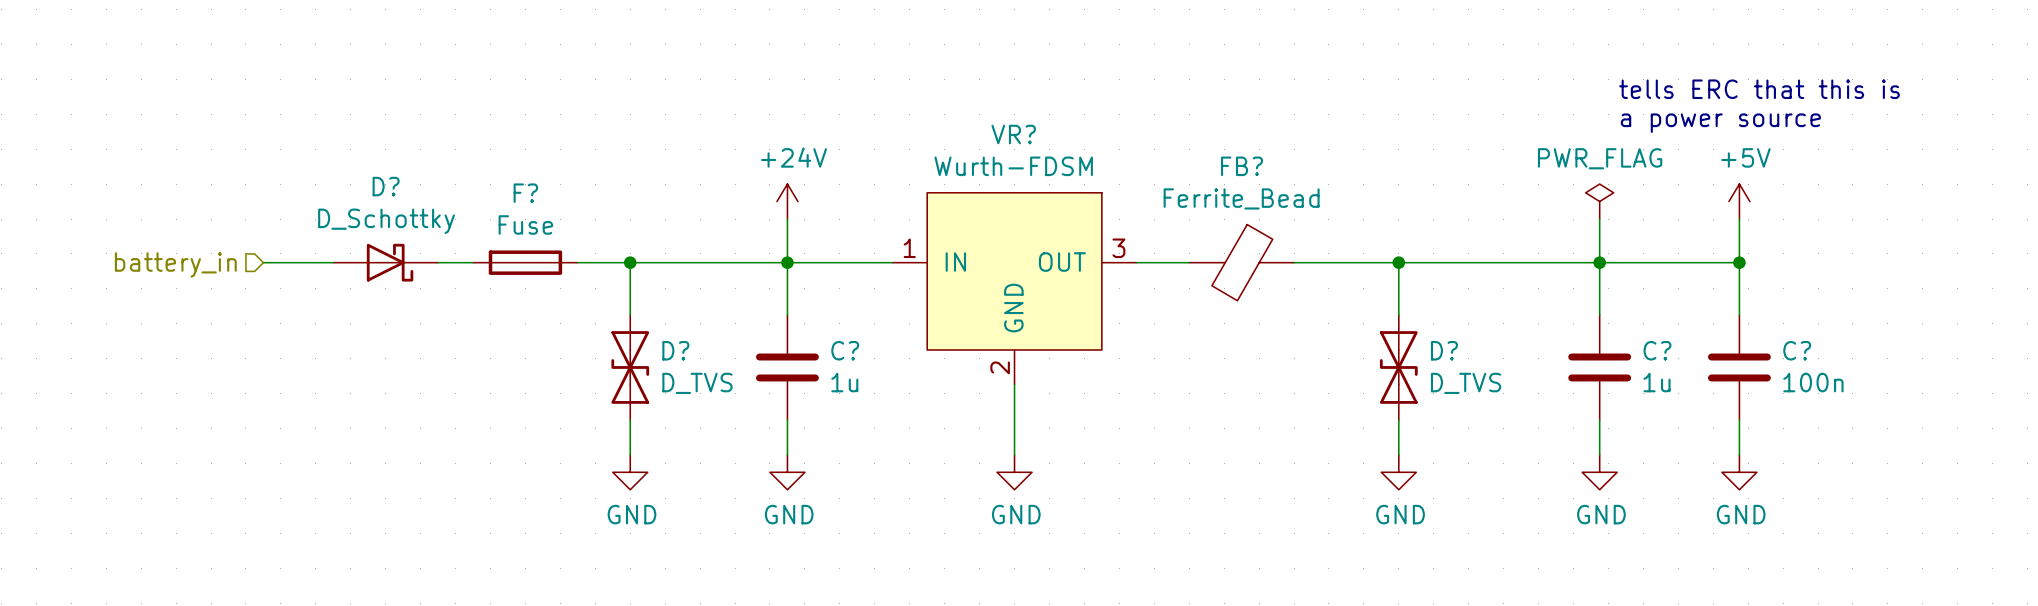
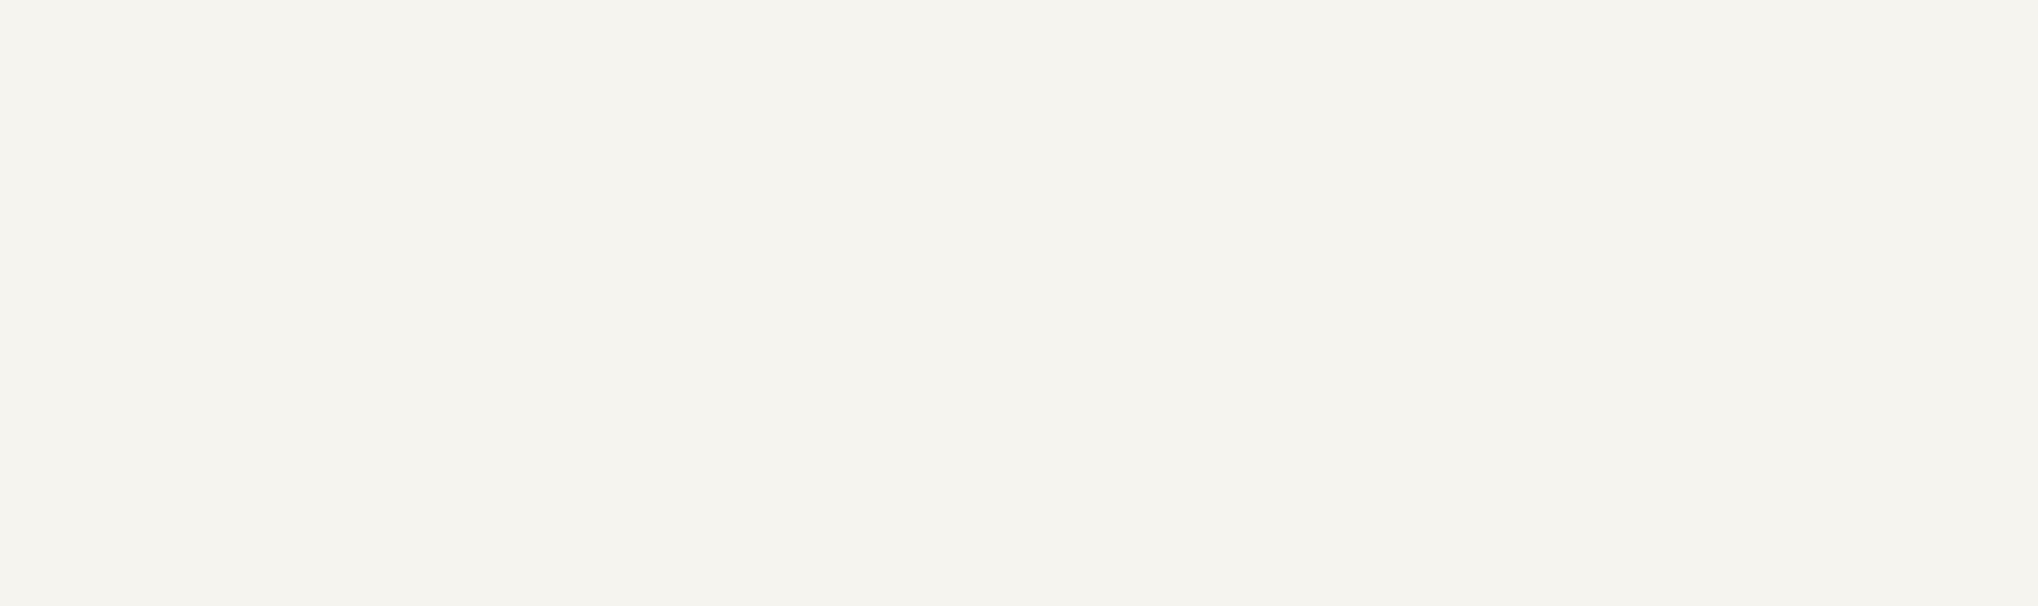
text: tells ERC that this is (1759, 89) -> none
text: a power source (1720, 123) -> none
power symbol: +24V (787, 201) -> none
power symbol: PWR_FLAG (1599, 201) -> none
power symbol: +5V (1739, 201) -> none
wire: (787, 219) (787, 315) -> none
wire: (1599, 219) (1599, 315) -> none
wire: (1739, 219) (1739, 315) -> none
wire: (263, 262) (333, 262) -> none
D?: D_Schottky (385, 262) -> none
wire: (438, 262) (473, 262) -> none
F?: Fuse (525, 262) -> none
wire: (577, 262) (892, 262) -> none
wire: (630, 262) (630, 315) -> none
junction: (630, 262) -> none
junction: (787, 262) -> none
wire: (1136, 262) (1189, 262) -> none
FB?: Ferrite_Bead (1241, 262) -> none
wire: (1294, 262) (1739, 262) -> none
wire: (1398, 262) (1398, 315) -> none
junction: (1398, 262) -> none
junction: (1599, 262) -> none
junction: (1739, 262) -> none
hierarchical label: battery_in (175, 264) -> none
VR?: Wurth-FDSM (1014, 288) -> none
D?: D_TVS (630, 367) -> none
C?: 1u (787, 367) -> none
D?: D_TVS (1398, 367) -> none
C?: 1u (1599, 367) -> none
C?: 100n (1739, 367) -> none
wire: (1014, 384) (1014, 454) -> none
wire: (630, 419) (630, 454) -> none
wire: (787, 419) (787, 454) -> none
wire: (1398, 419) (1398, 454) -> none
wire: (1599, 419) (1599, 454) -> none
wire: (1739, 419) (1739, 454) -> none
power symbol: GND (630, 472) -> none
power symbol: GND (787, 472) -> none
power symbol: GND (1014, 472) -> none
power symbol: GND (1398, 472) -> none
power symbol: GND (1599, 472) -> none
power symbol: GND (1739, 472) -> none

